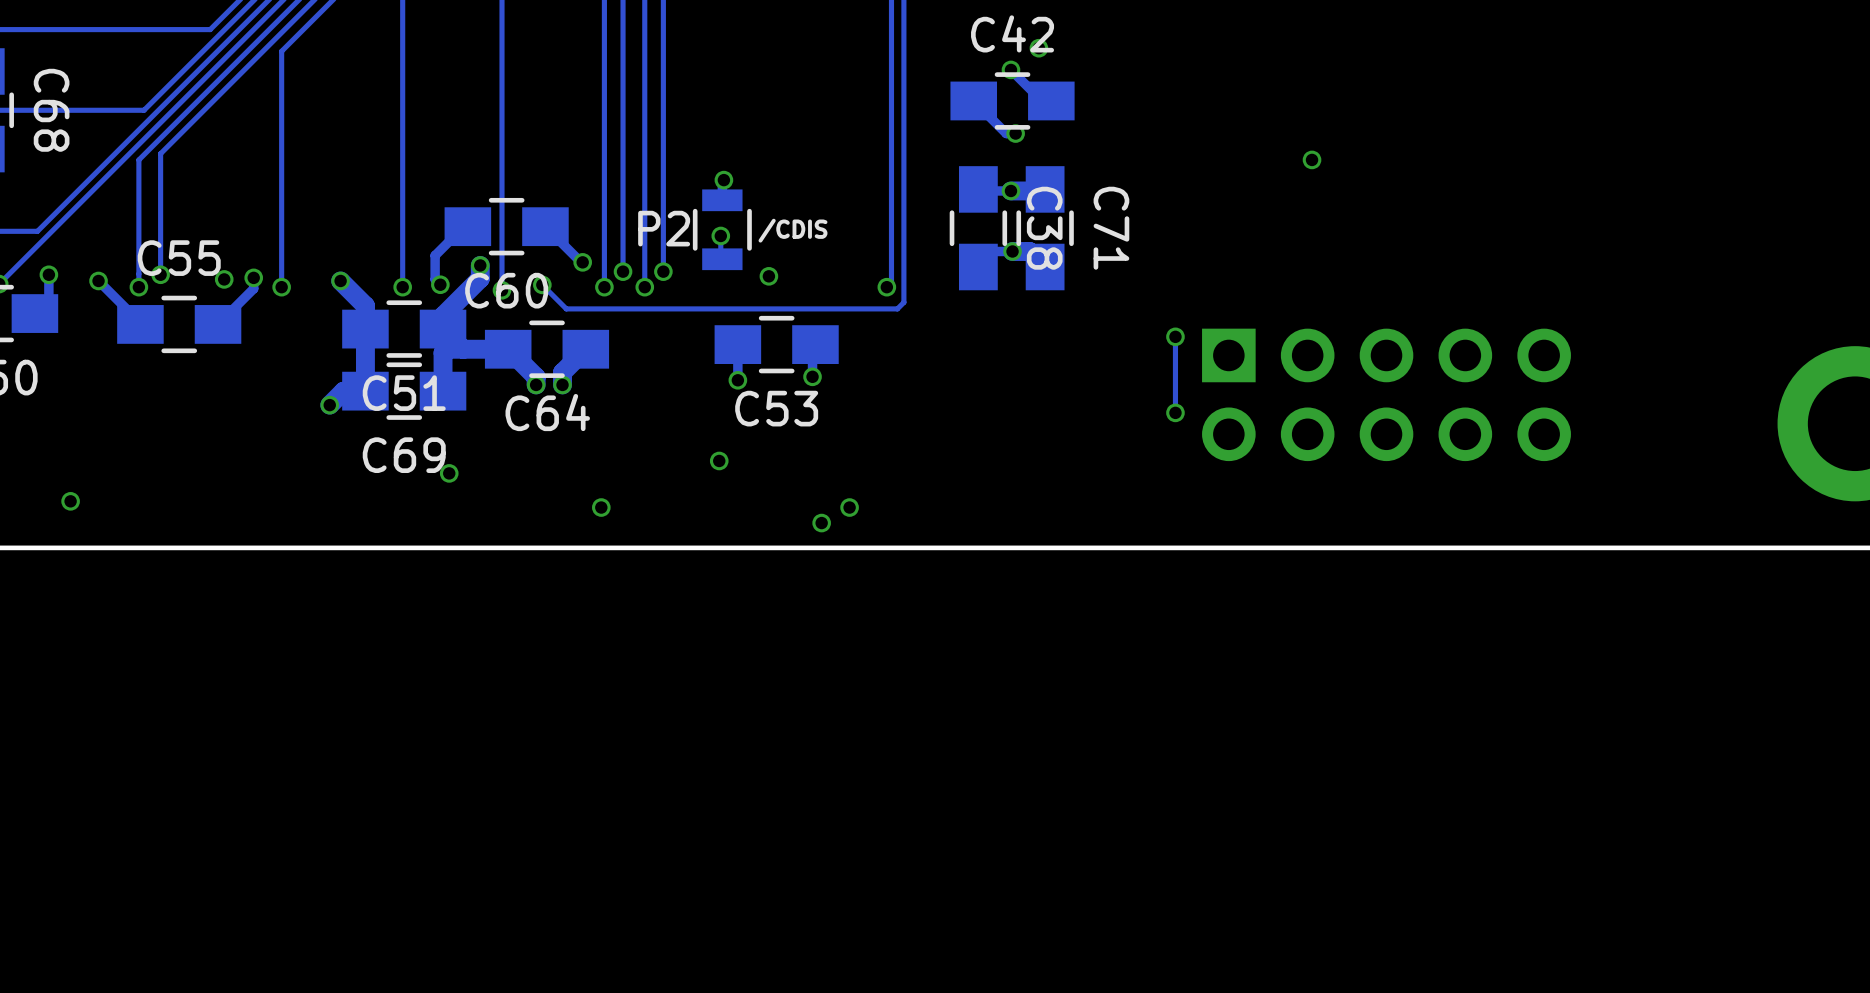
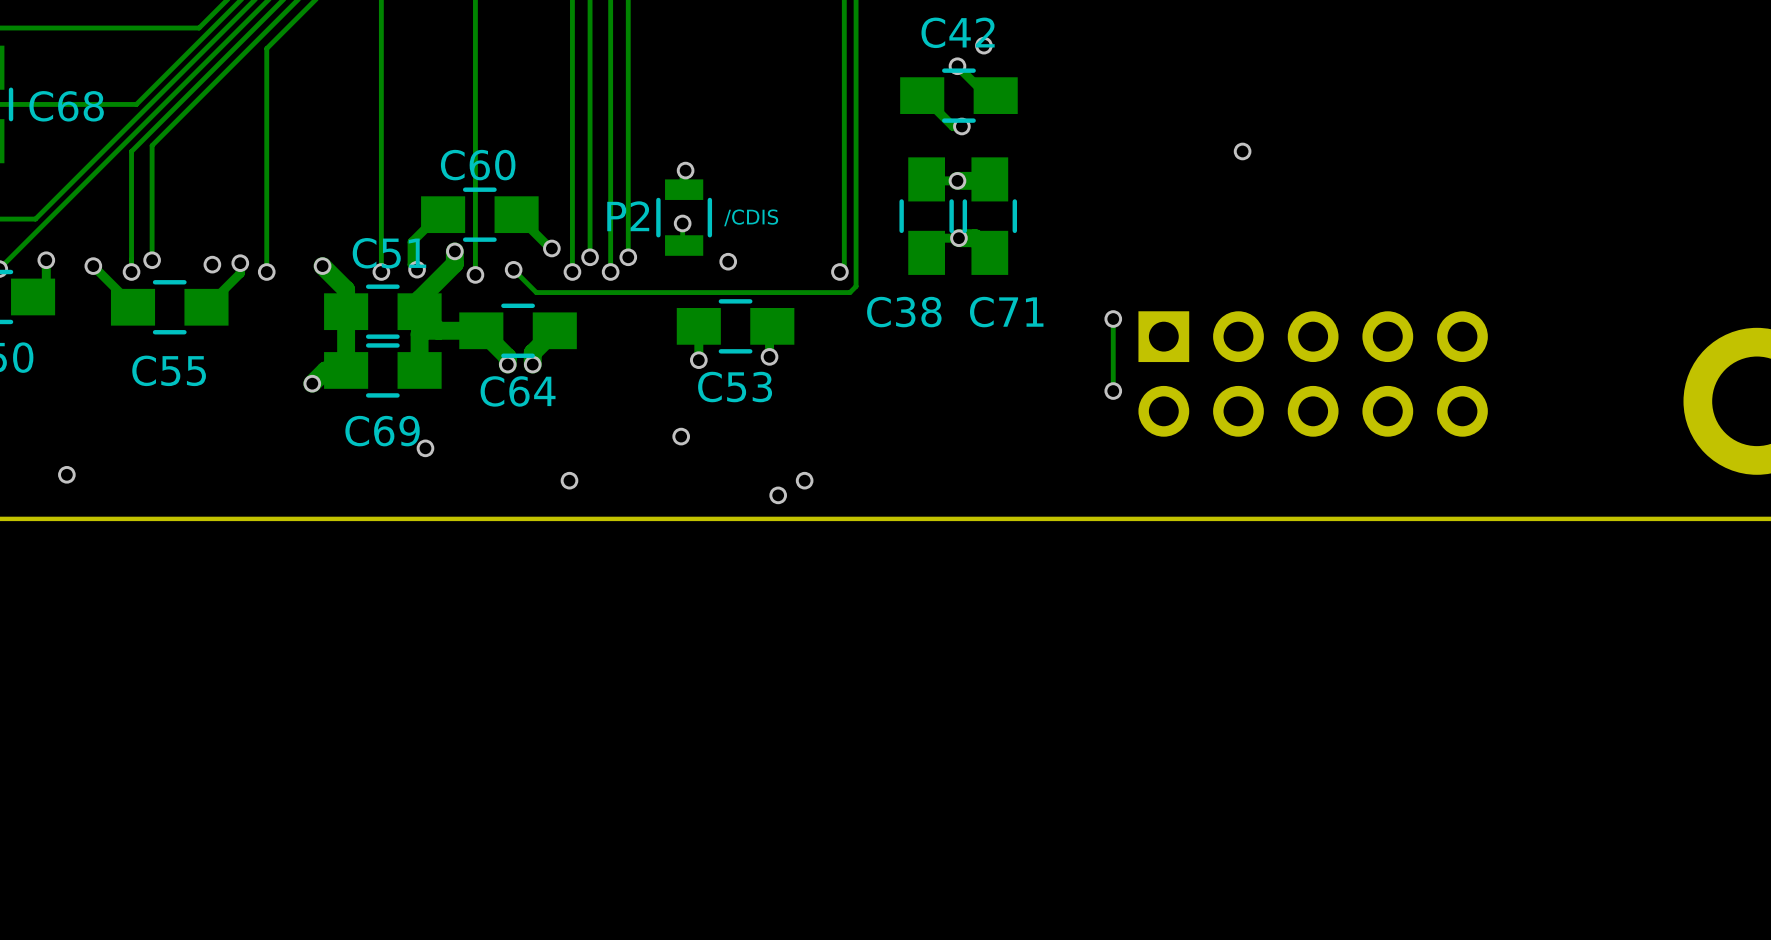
C68 name rotation: 0° (51, 110) -> 90° counterclockwise (66, 106)
C38 name rotation: 0° (1044, 228) -> 90° counterclockwise (904, 312)
C38 name position: C38 (1044, 228) -> C38 (904, 312)
C71 name rotation: 0° (1111, 228) -> 90° counterclockwise (1006, 312)
C71 name position: C71 (1111, 228) -> C71 (1006, 312)
C55 name position: C55 (179, 258) -> C55 (169, 370)
C60 name position: C60 (506, 290) -> C60 (478, 165)
C51 name position: C51 (404, 393) -> C51 (389, 253)

